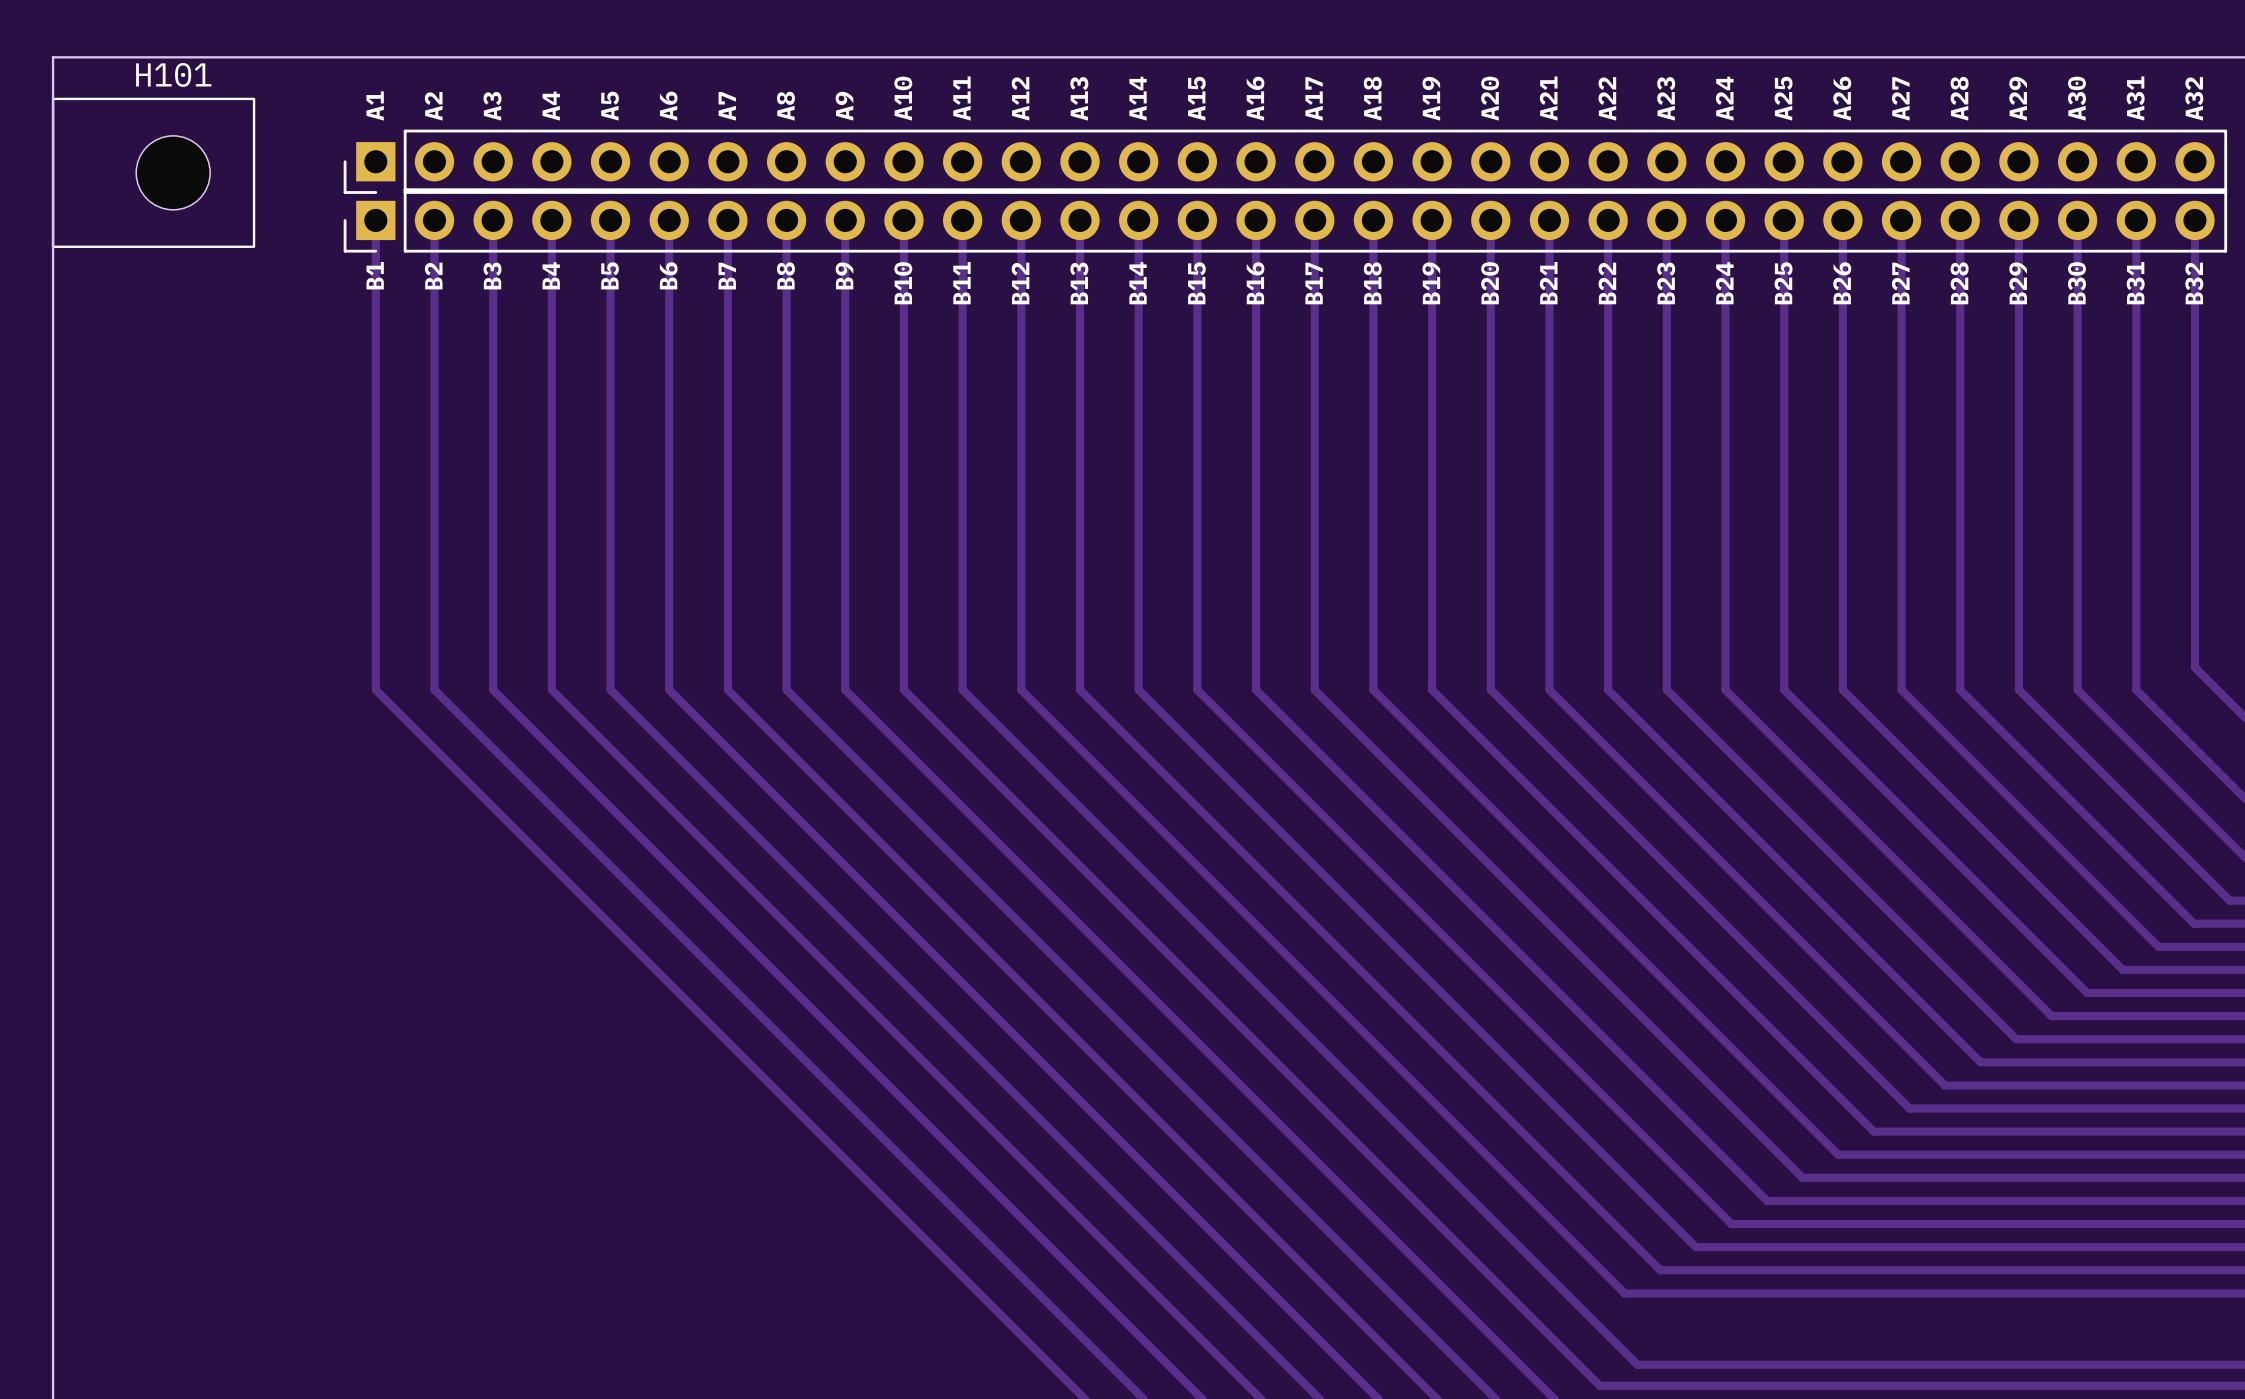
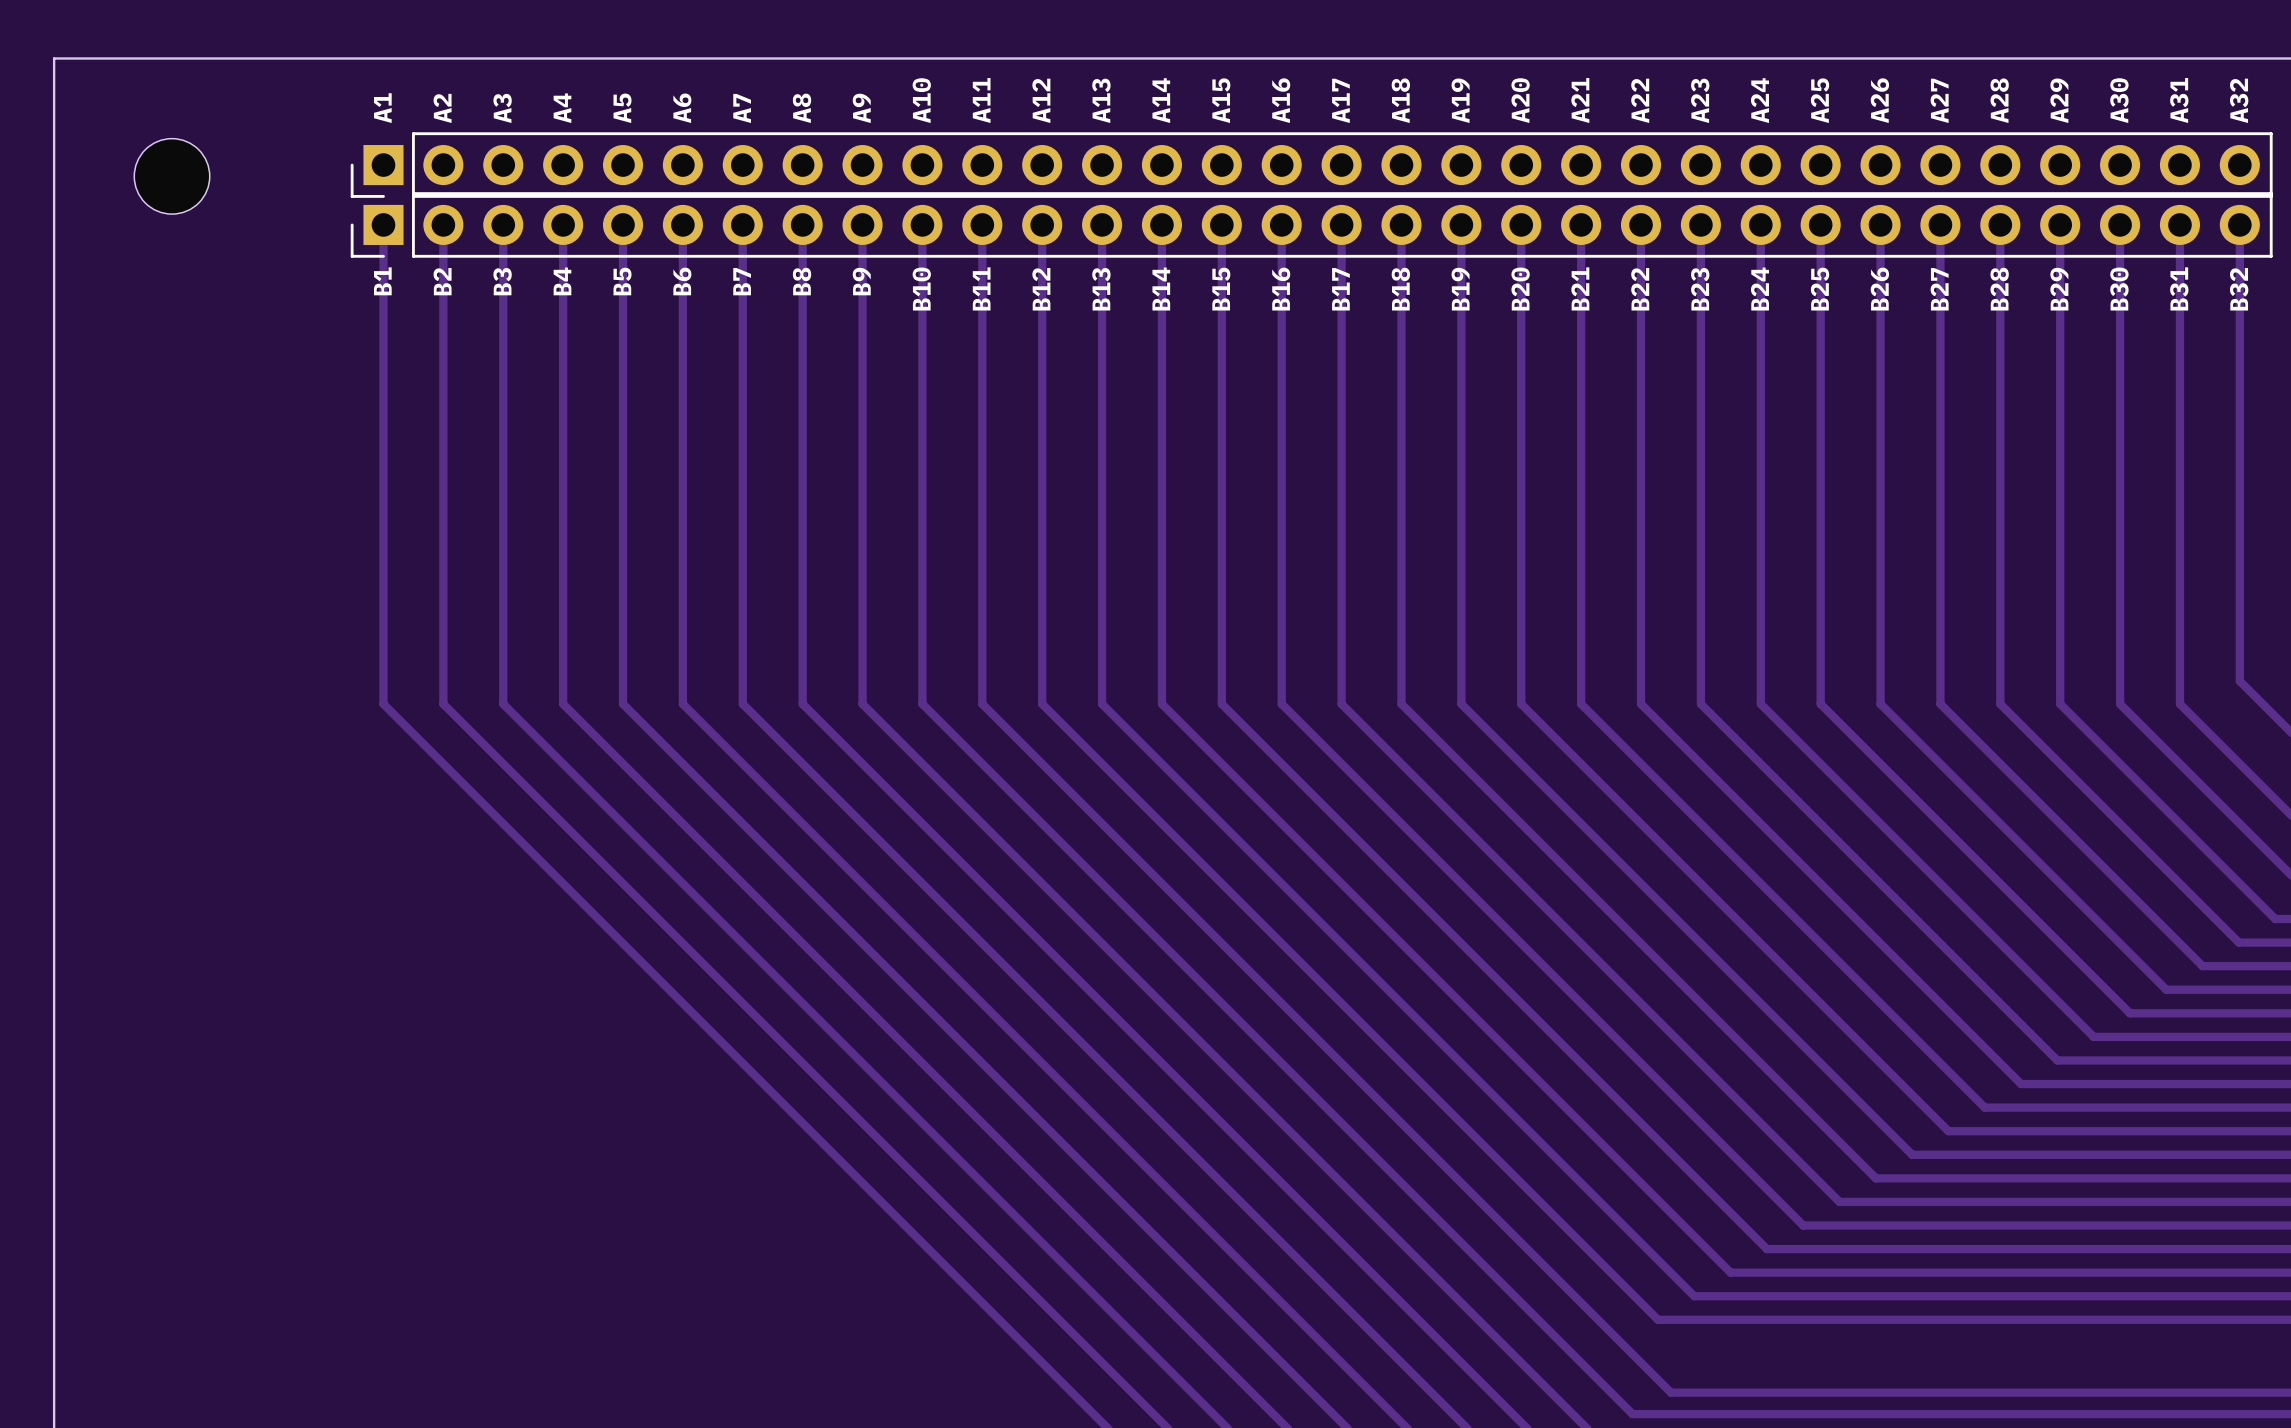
H101: (153, 172) -> none
part: none -> (172, 176)

